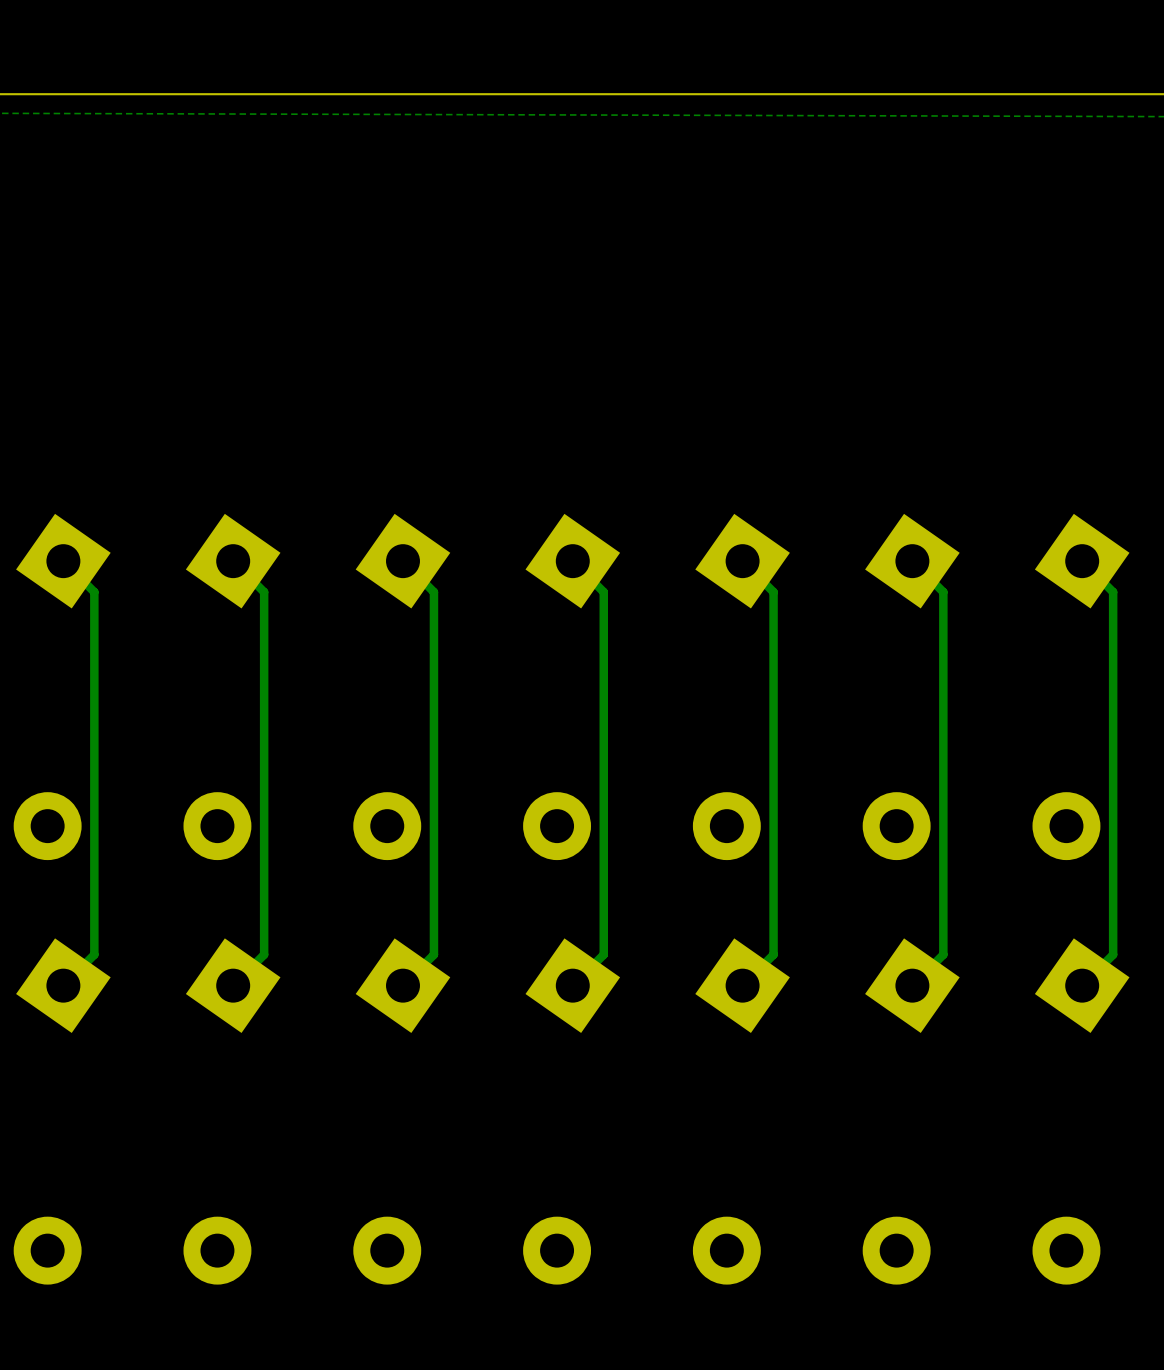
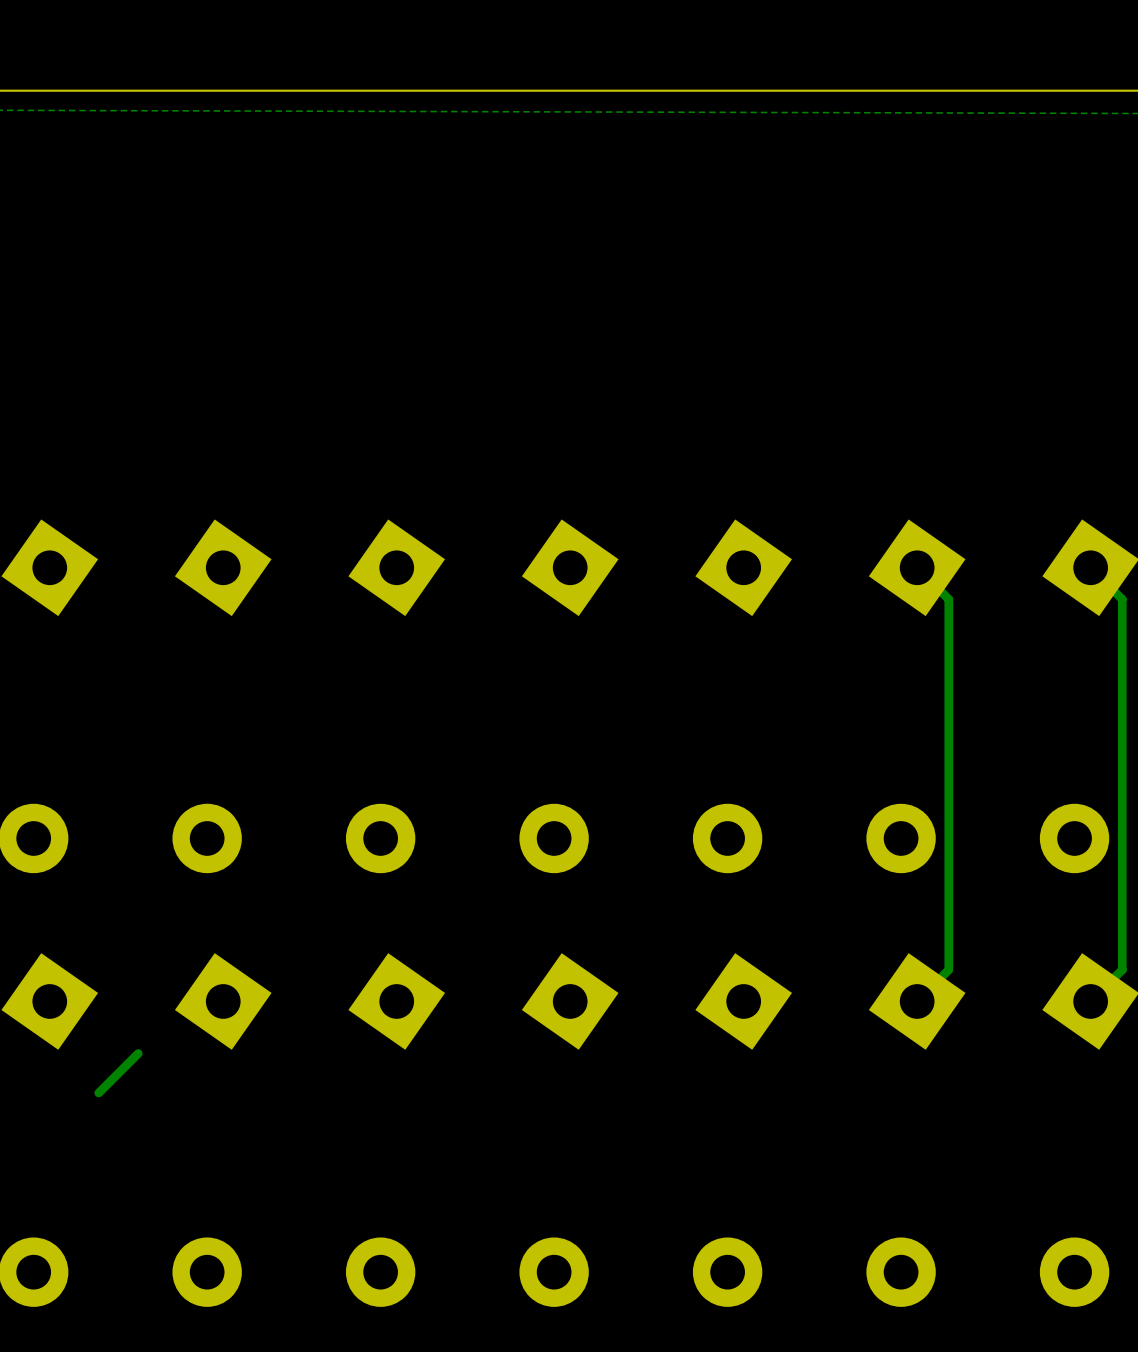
track: (63, 561) (94, 592) (94, 954) (63, 985) -> none
track: (233, 561) (264, 592) (264, 954) (233, 985) -> none
track: (402, 561) (433, 592) (433, 954) (402, 985) -> none
track: (572, 561) (603, 592) (603, 954) (572, 985) -> none
track: (742, 561) (773, 592) (773, 954) (742, 985) -> none
track: none -> (138, 1053) (98, 1092)

